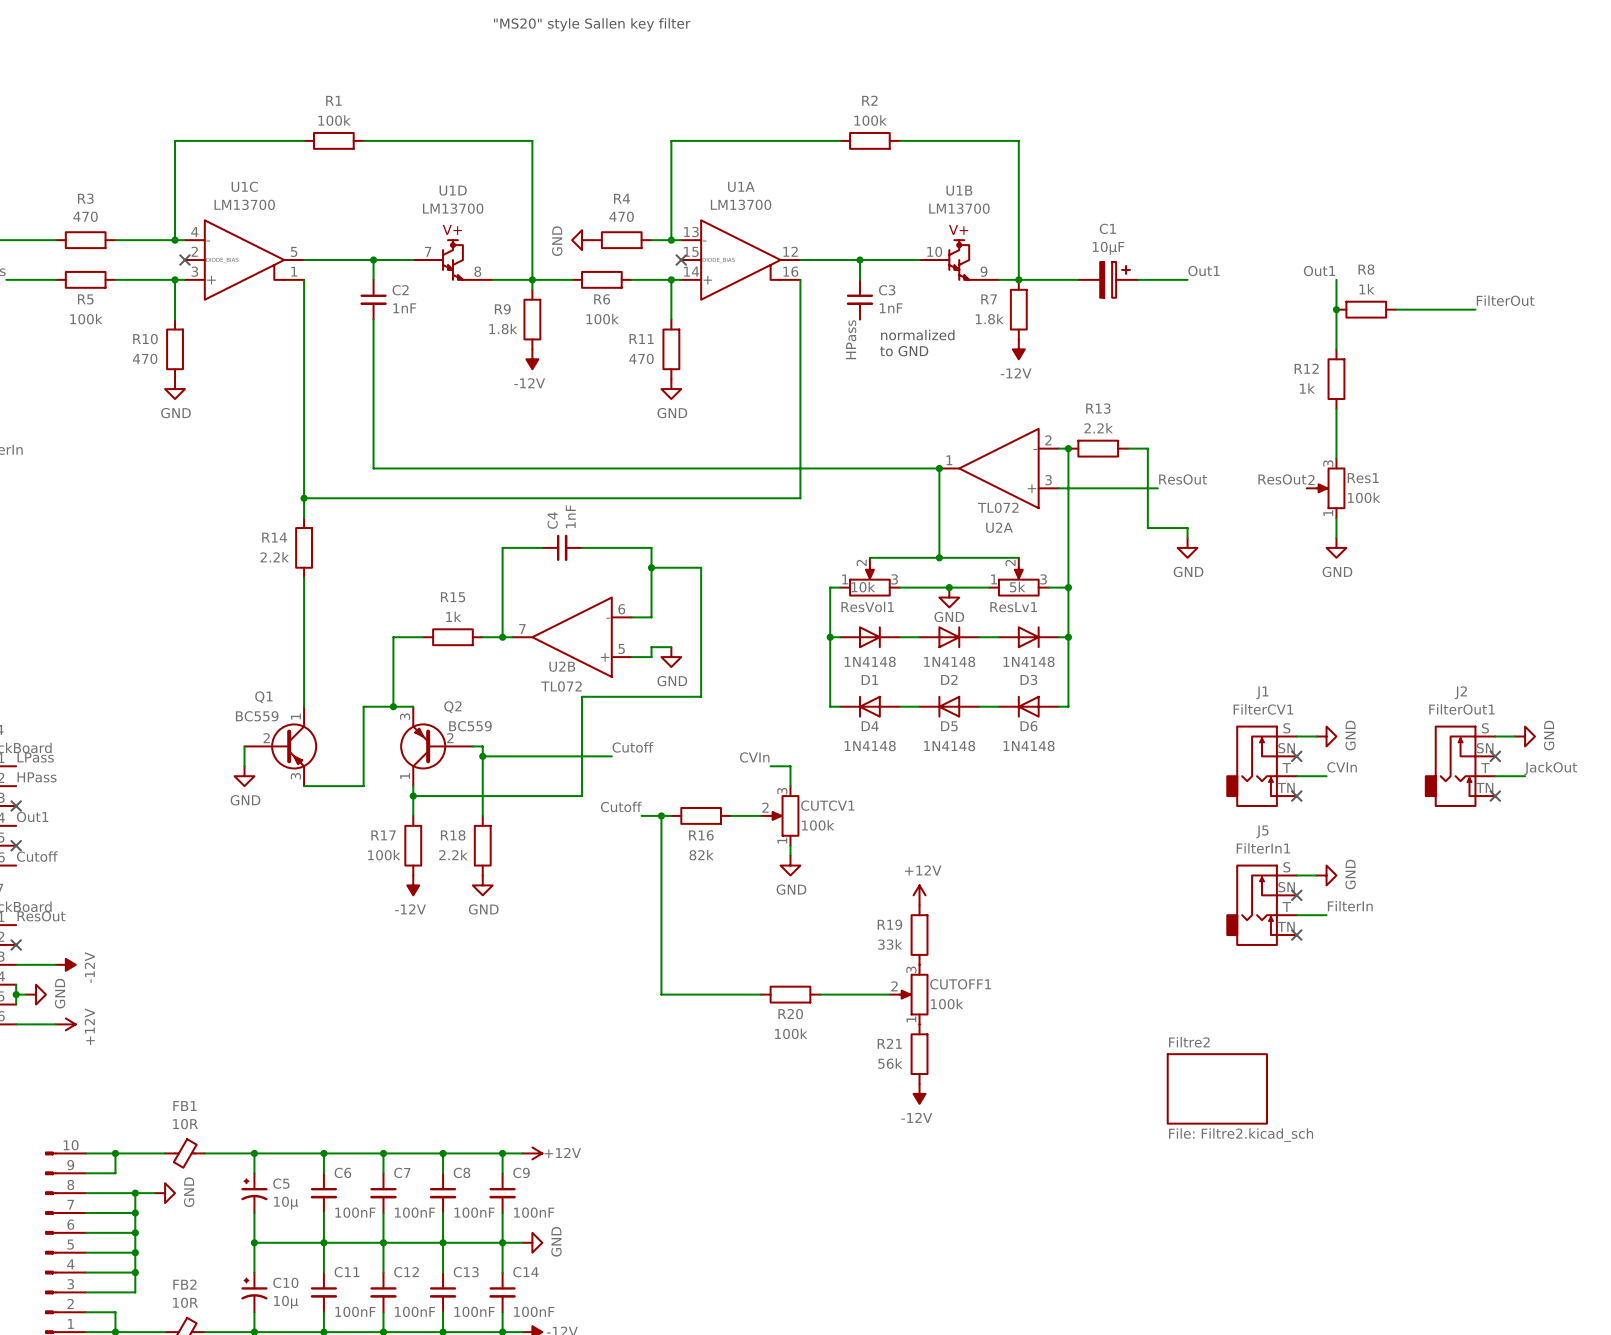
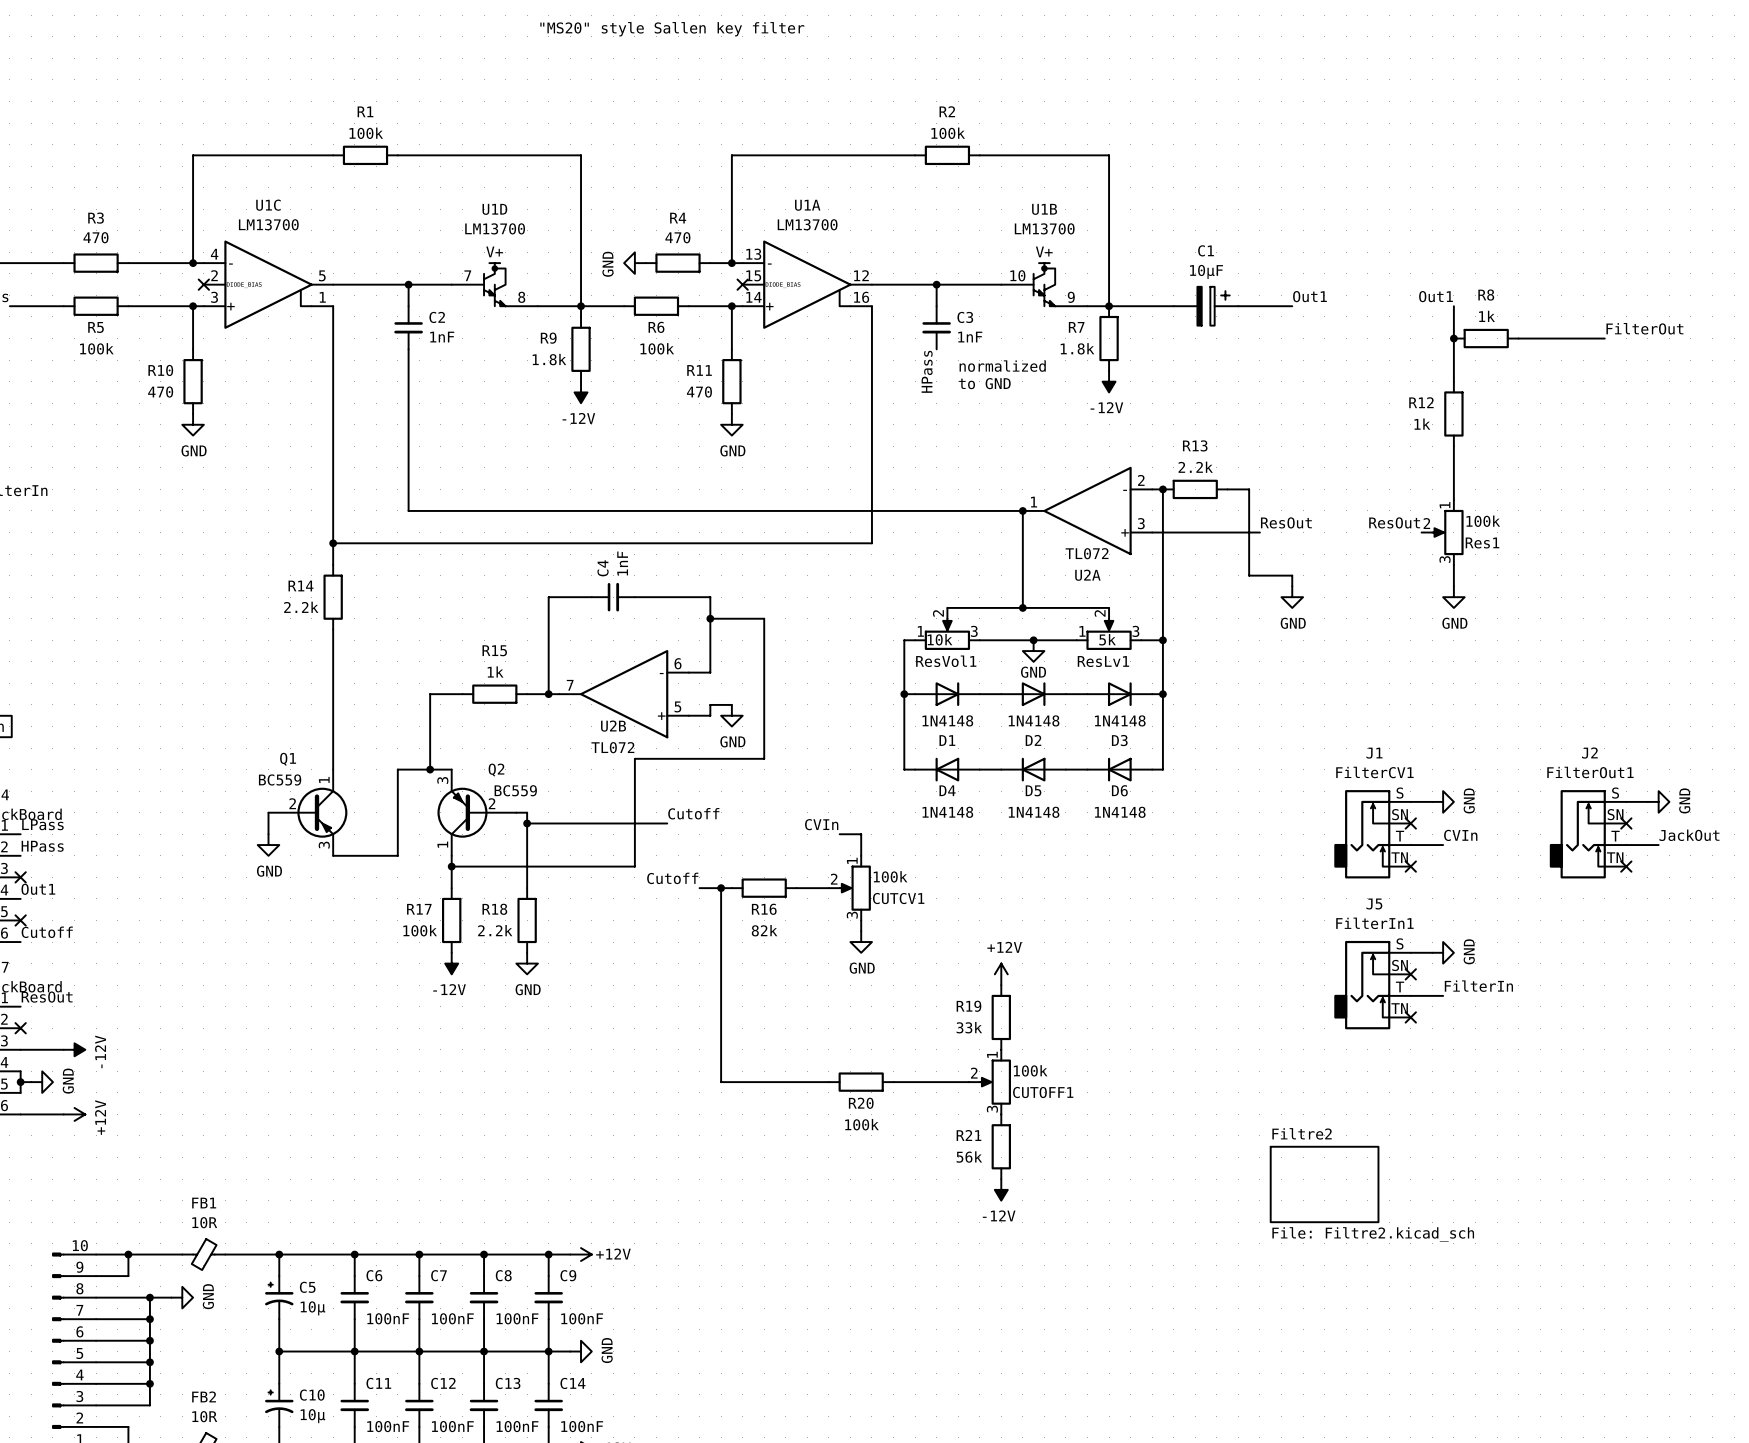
Res1 flip: as is (1331, 488) -> up-down (1447, 532)
CUTCV1 flip: as is (785, 815) -> up-down (855, 888)
CUTOFF1 flip: as is (914, 994) -> up-down (995, 1082)

